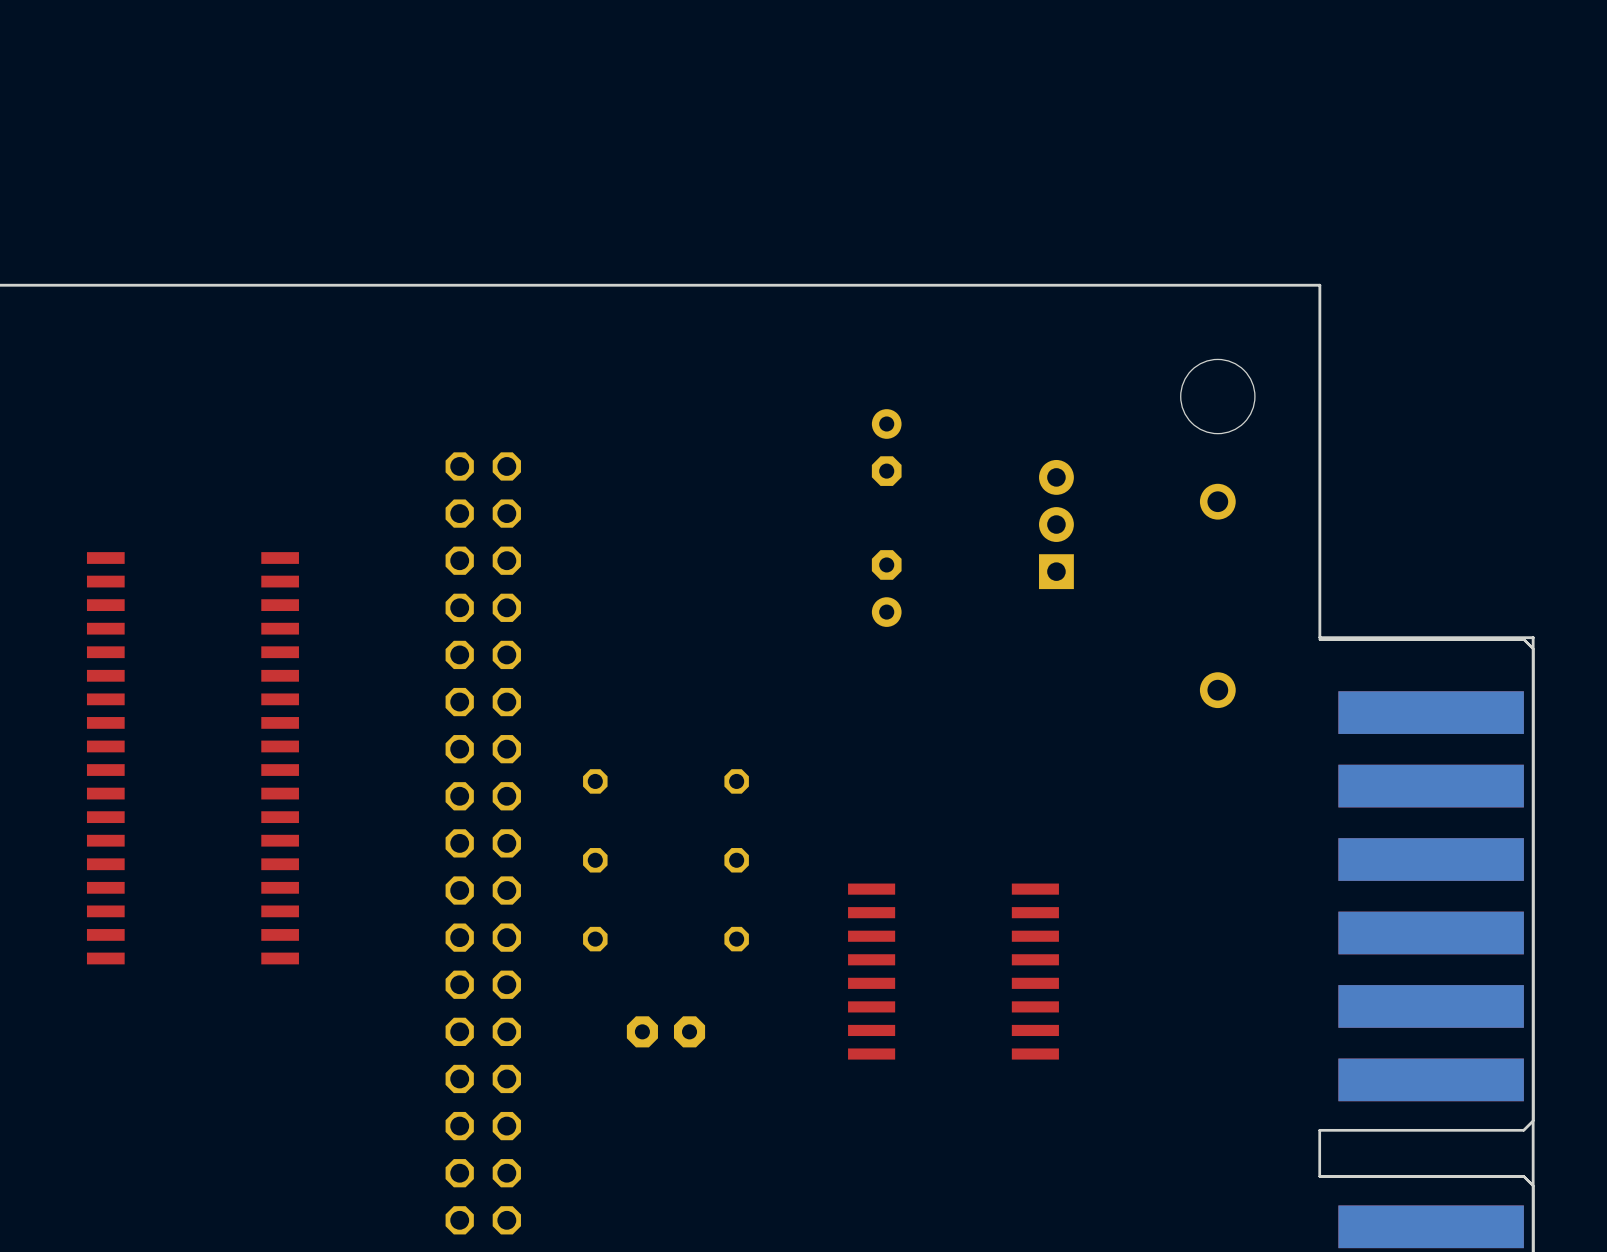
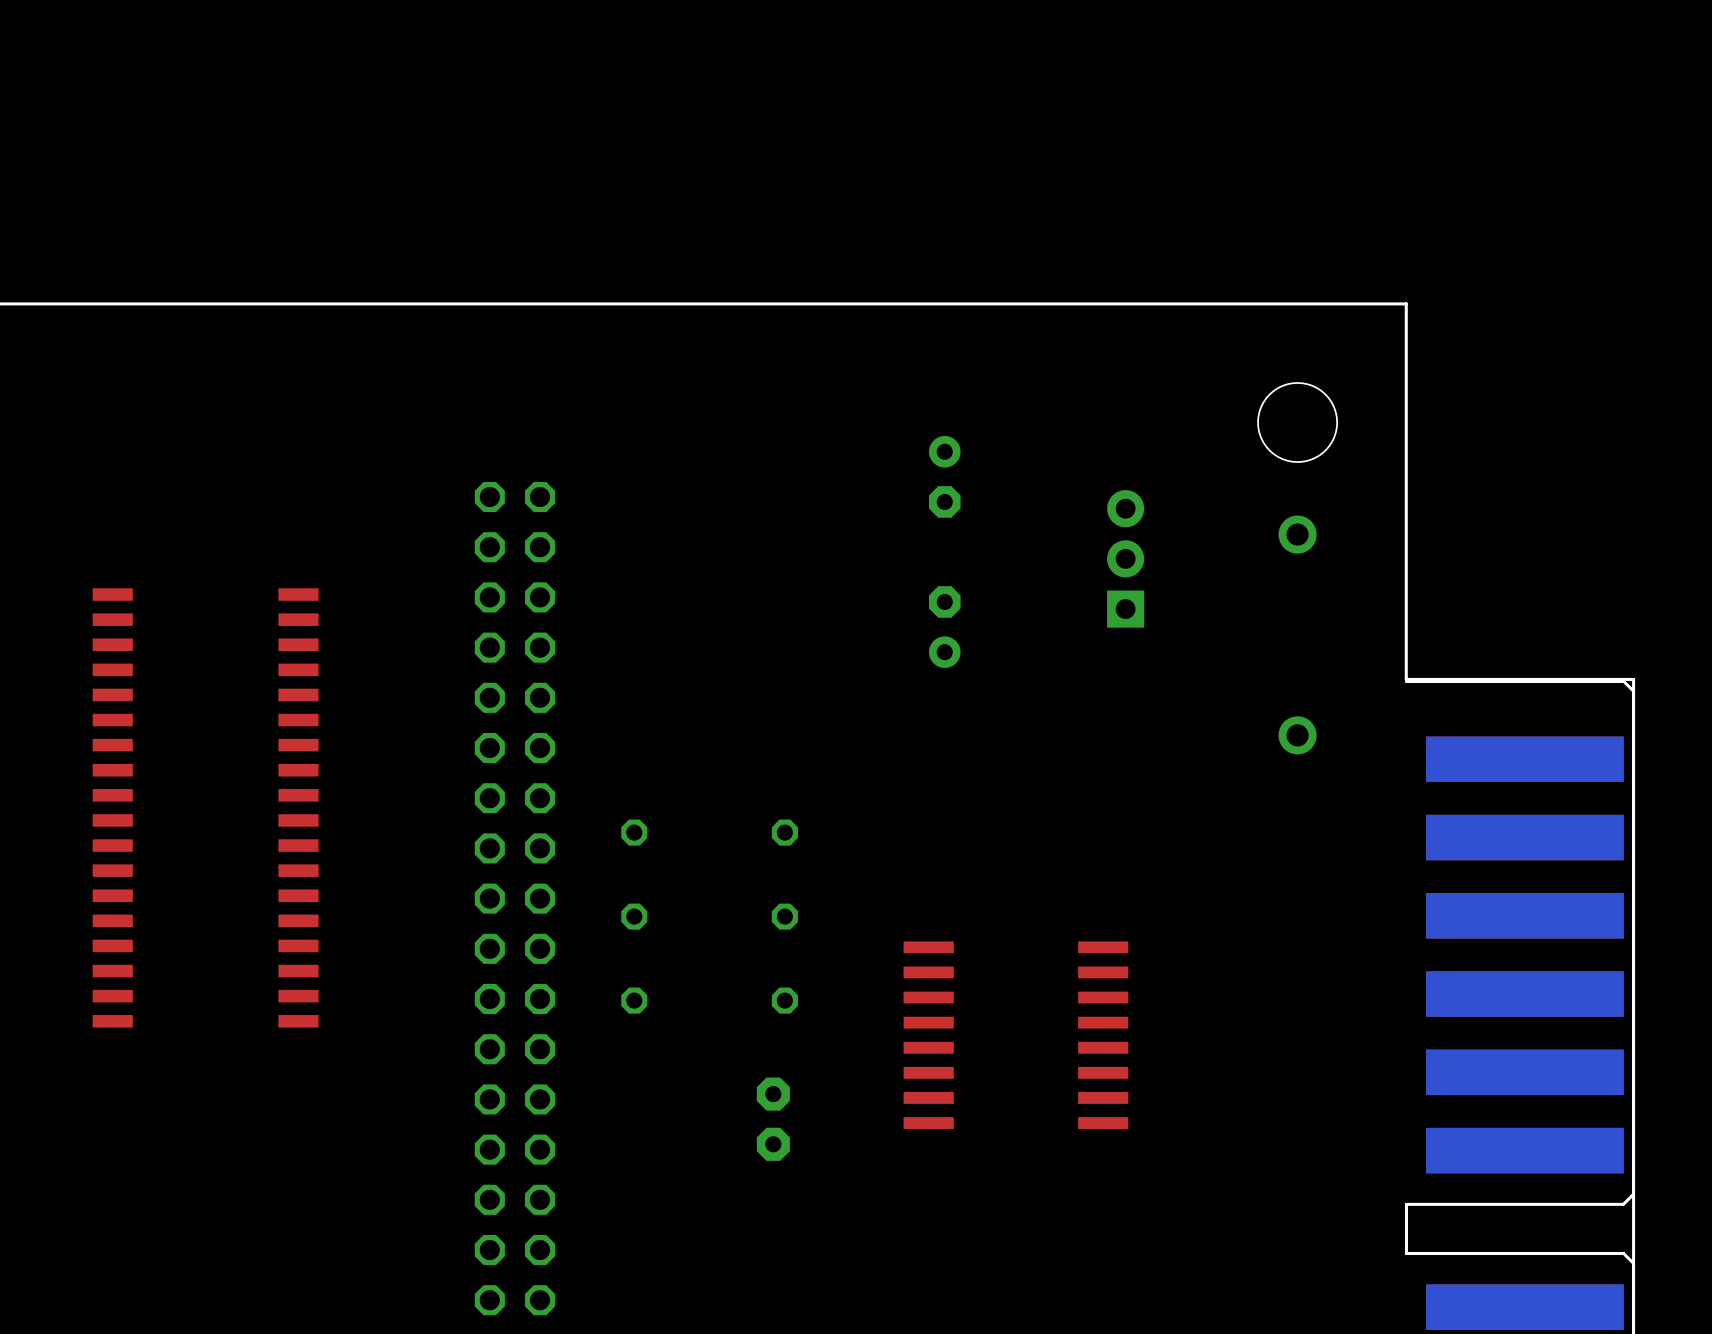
part rotation: 0° (665, 1031) -> 90° clockwise (773, 1119)
part position: (665, 1031) -> (773, 1119)

